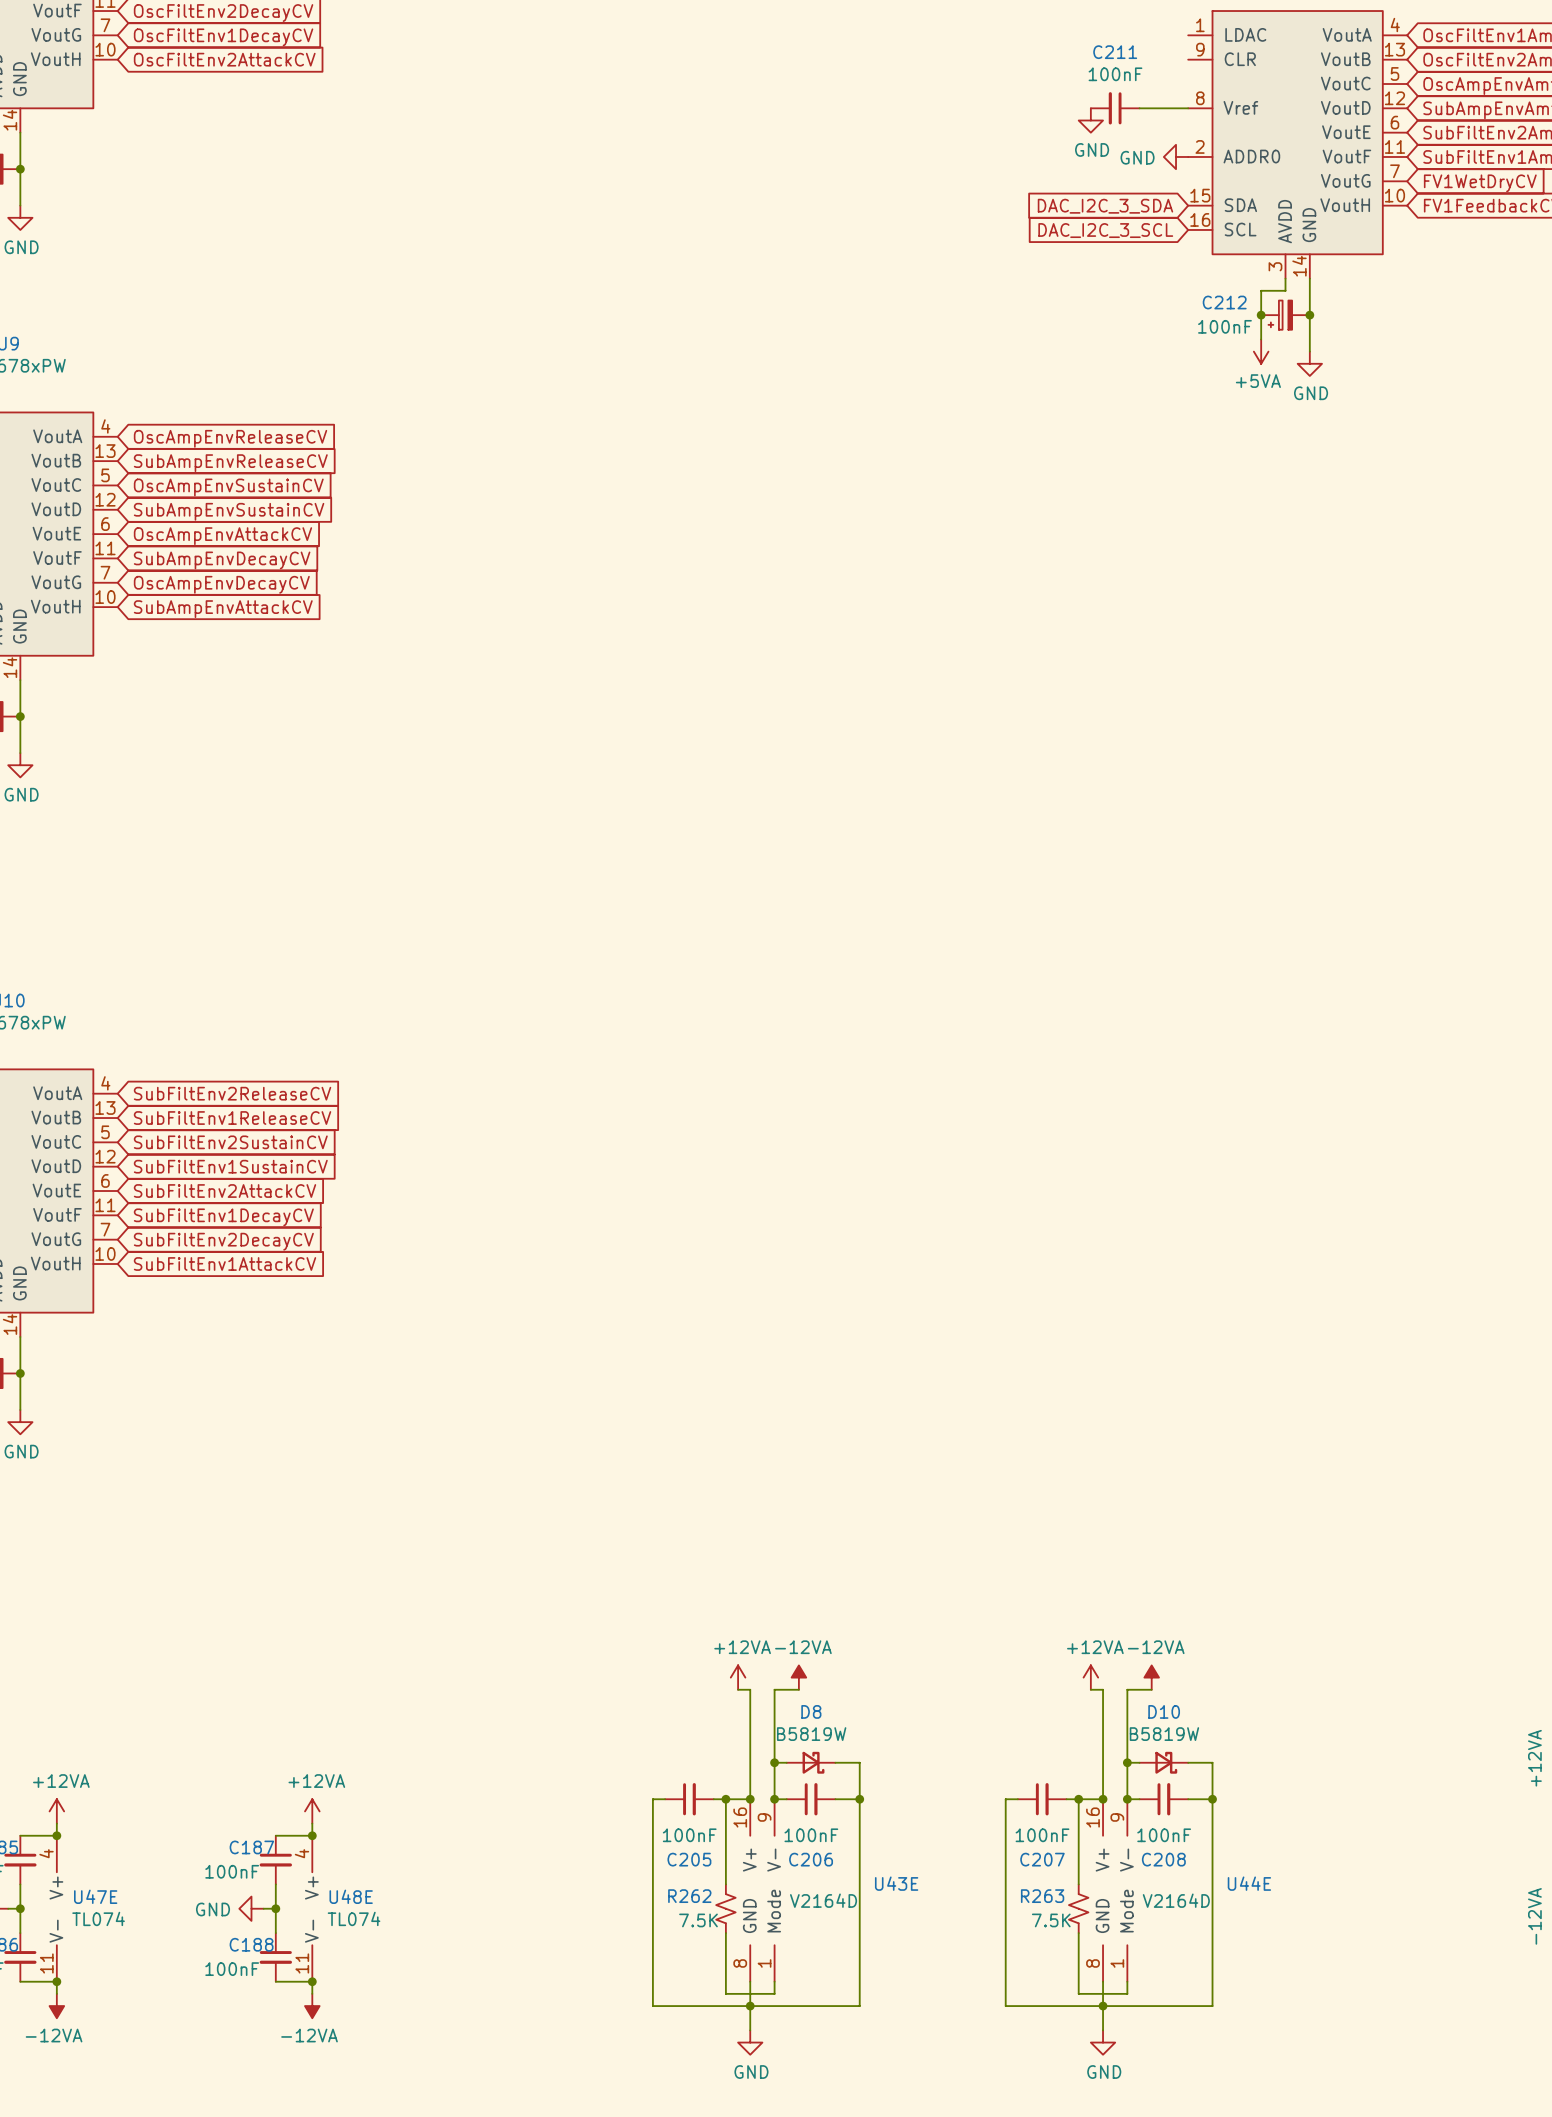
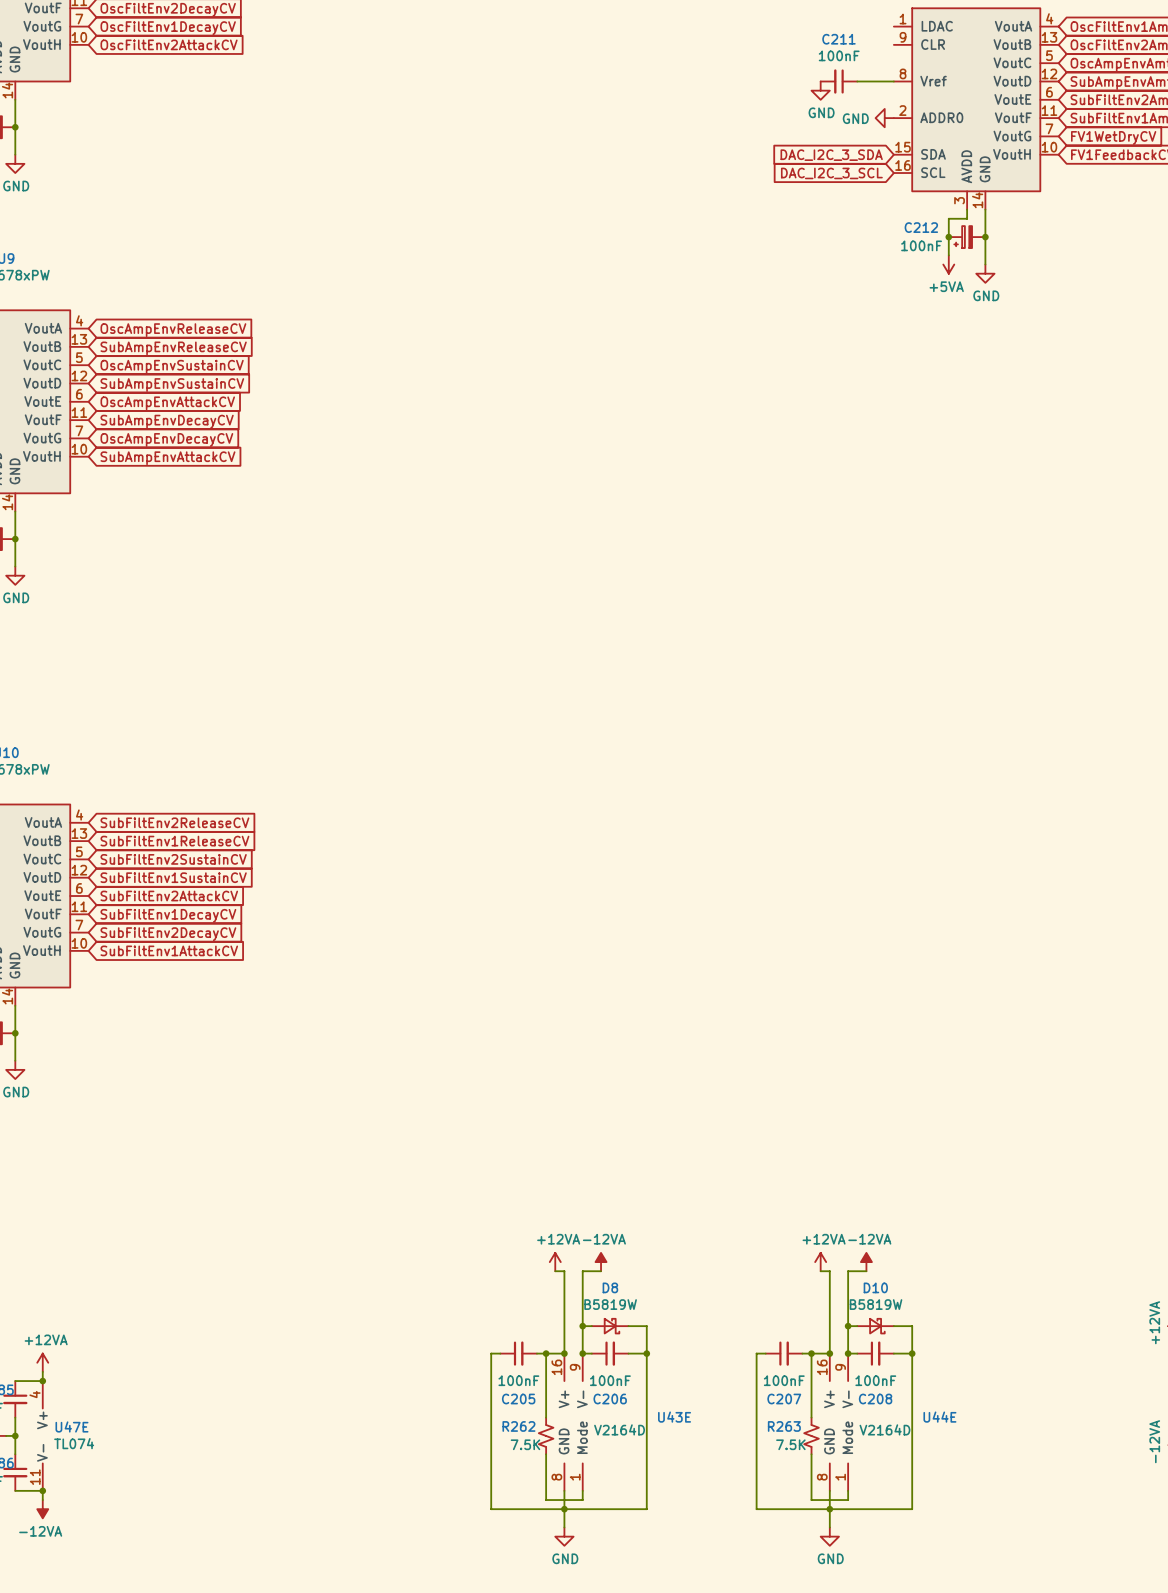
power symbol: +12VA (312, 1811) -> none
wire: (312, 1823) (312, 1835) (275, 1835) -> none
junction: (312, 1835) -> none
C187: 100nF (275, 1860) -> none
wire: (275, 1884) (275, 1933) -> none
power symbol: GND (251, 1908) -> none
wire: (263, 1908) (275, 1908) -> none
junction: (275, 1908) -> none
U48E: TL074 (312, 1908) -> none
C188: 100nF (275, 1957) -> none
wire: (275, 1981) (312, 1981) (312, 1993) -> none
junction: (312, 1981) -> none
power symbol: -12VA (312, 2006) -> none

